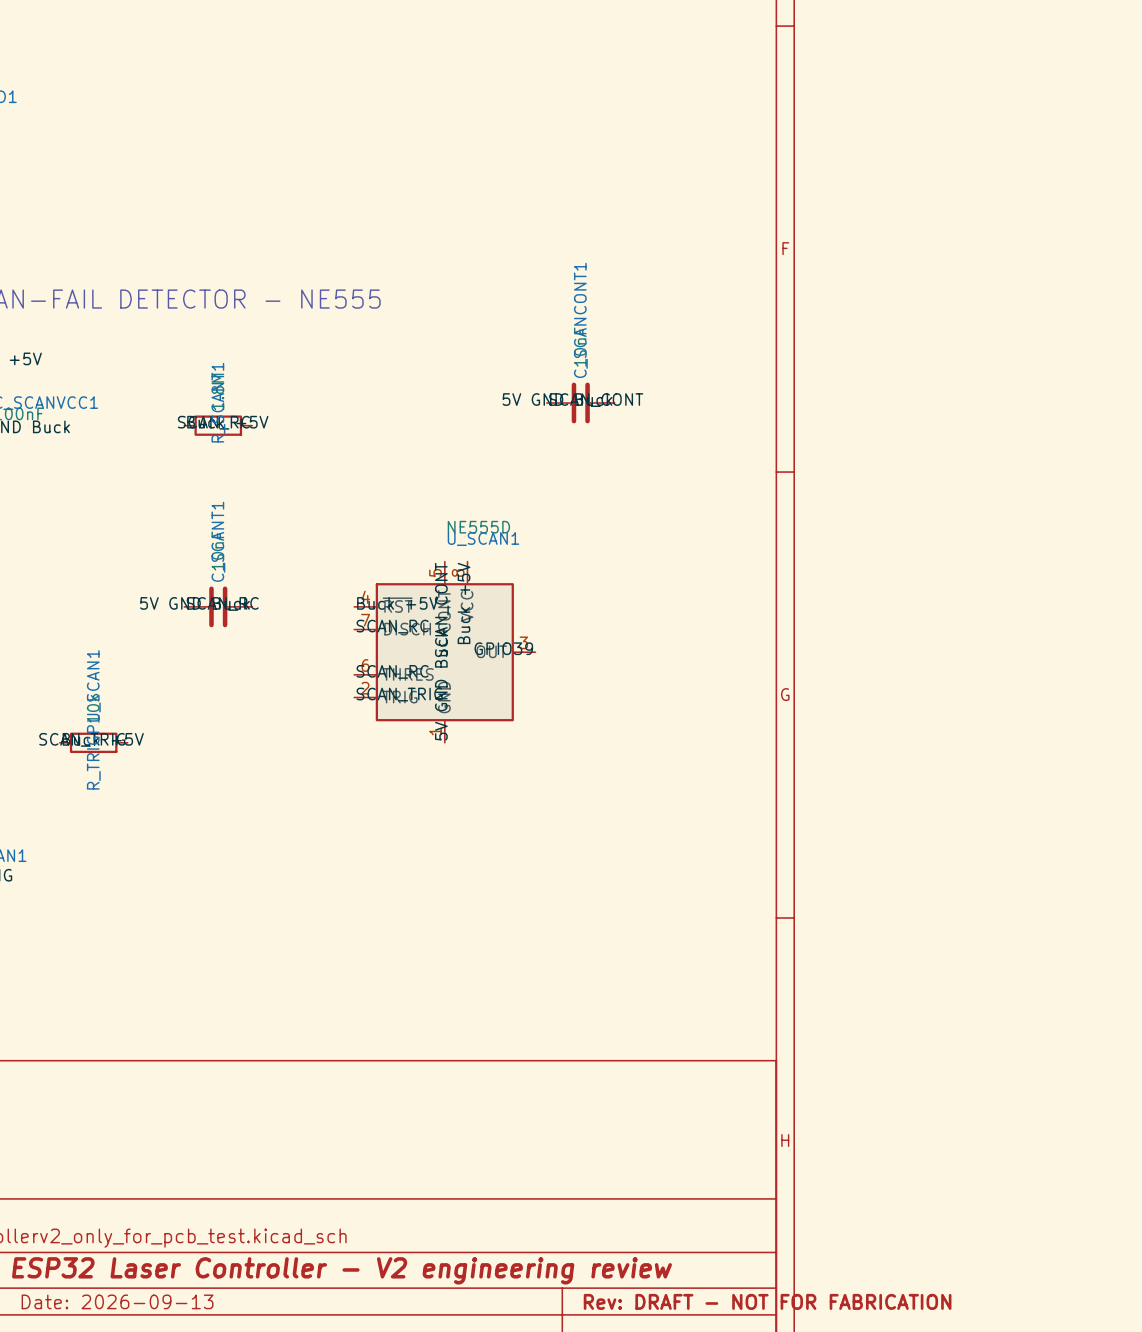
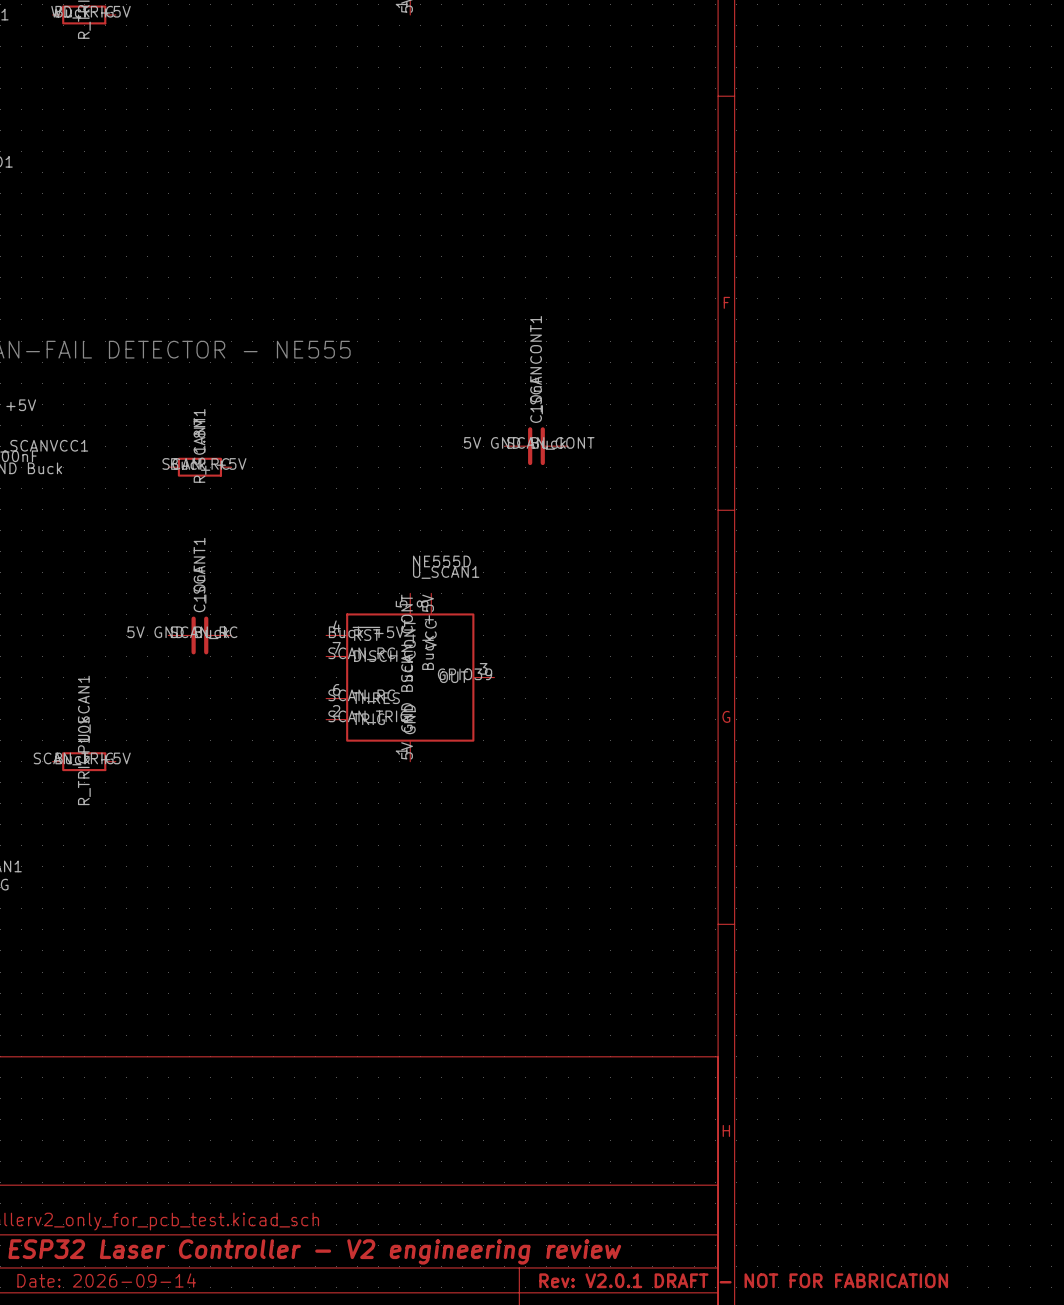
title block: Date: 2026-09-13 (117, 1301) -> Date: 2026-09-14 (106, 1280)
title block: Rev: DRAFT - NOT FOR FABRICATION (767, 1301) -> Rev: V2.0.1 DRAFT - NOT FOR FABRICATION (743, 1280)

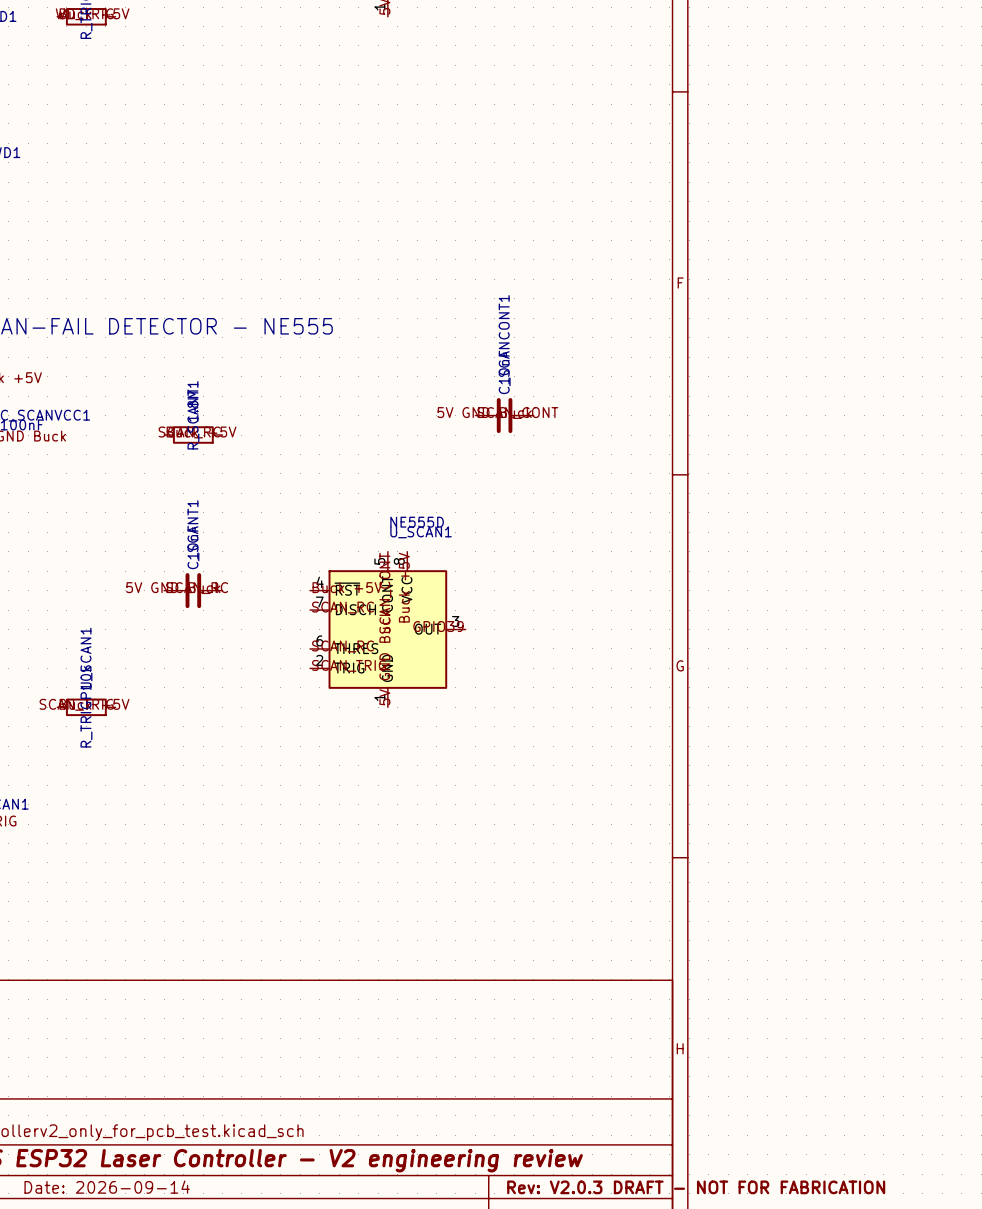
title block: Rev: V2.0.1 DRAFT - NOT FOR FABRICATION (743, 1280) -> Rev: V2.0.3 DRAFT - NOT FOR FABRICATION (696, 1187)

